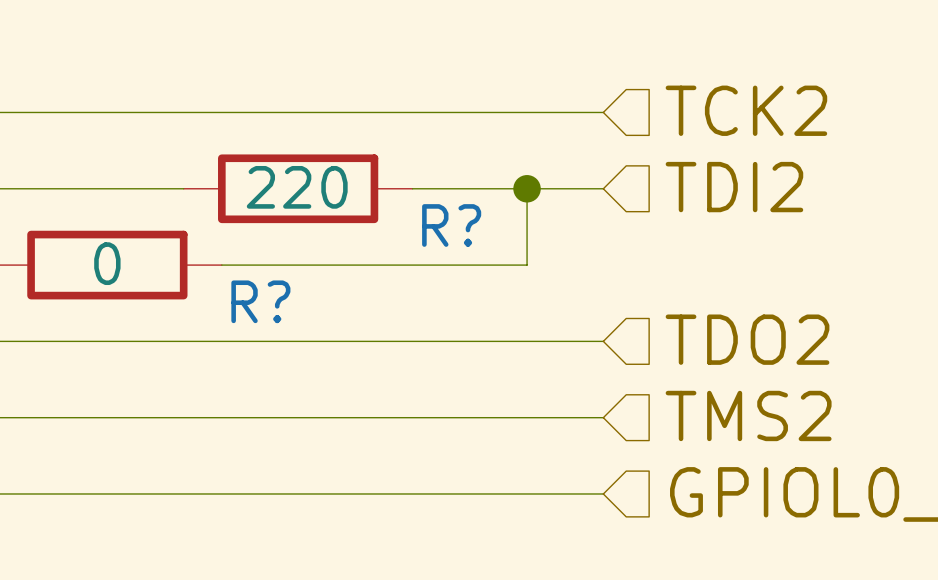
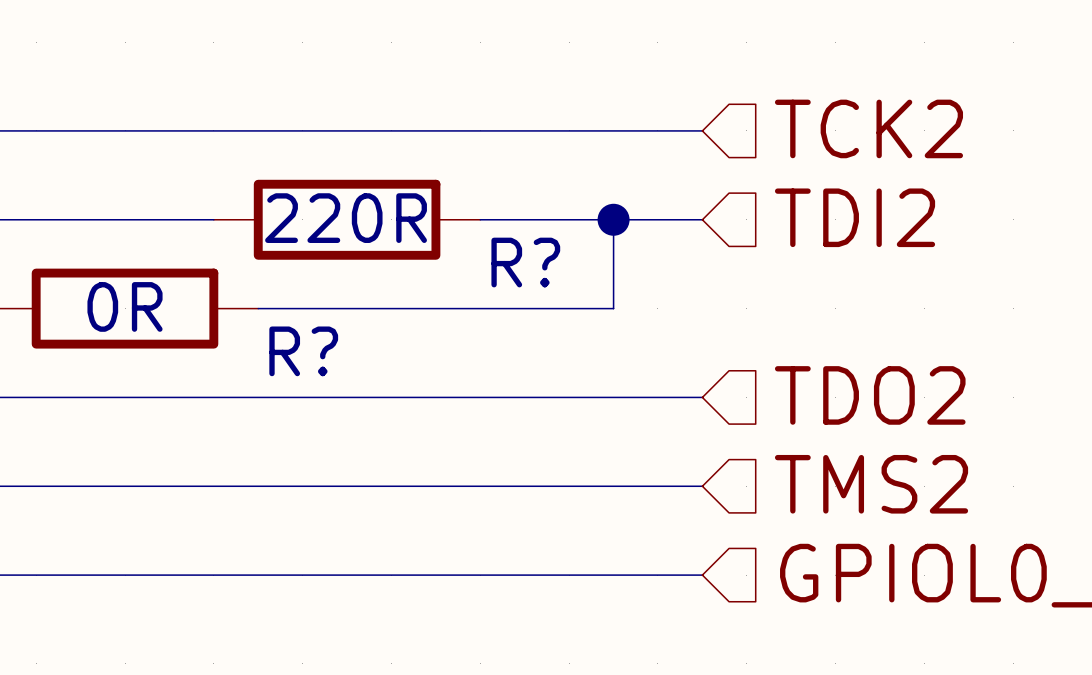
R? value: 220 (297, 187) -> 220R (346, 218)
R? value: 0 (107, 263) -> 0R (125, 306)

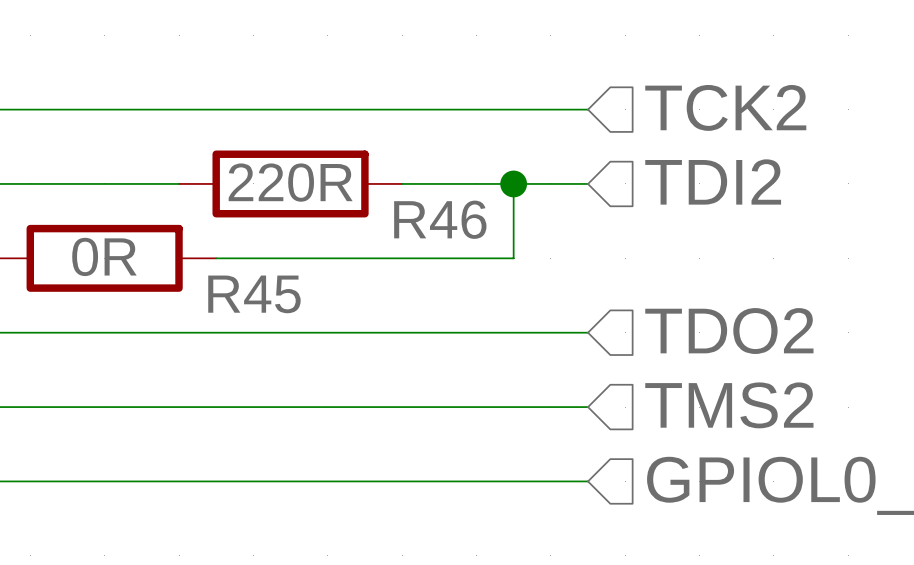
R? name: R? (525, 262) -> R46 (440, 219)
R? name: R? (303, 351) -> R45 (254, 294)

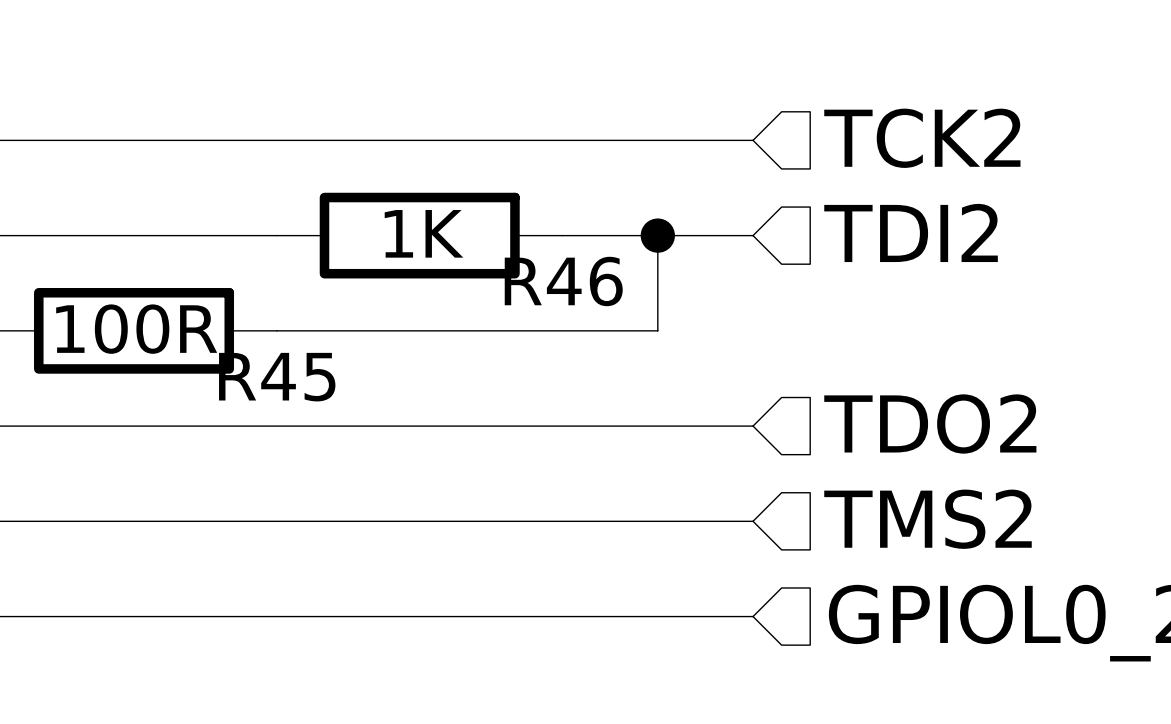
R46 value: 220R (290, 182) -> 1K (424, 233)
R46 position: (290, 183) -> (419, 235)
R45 value: 0R (104, 256) -> 100R (136, 329)
R45 name position: R45 (254, 294) -> R45 (277, 377)

